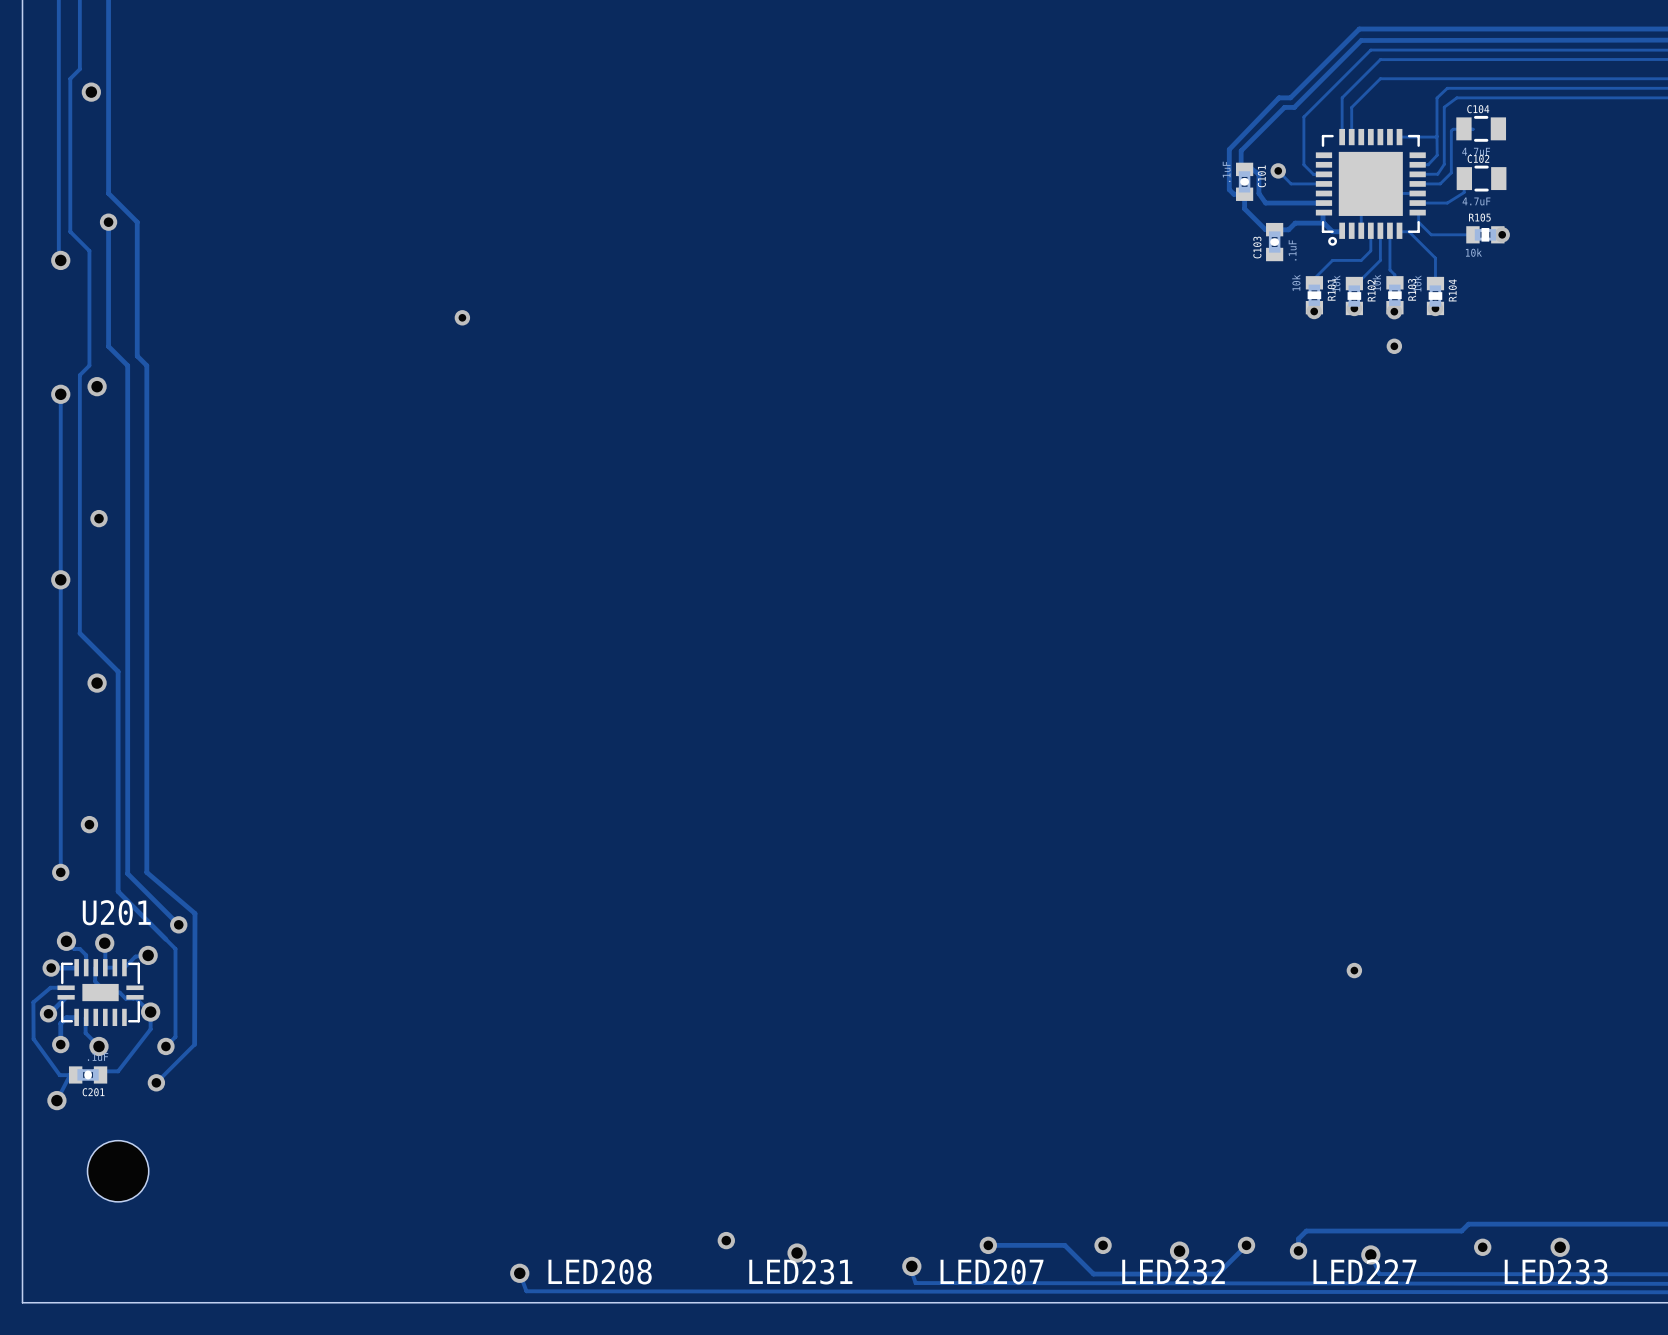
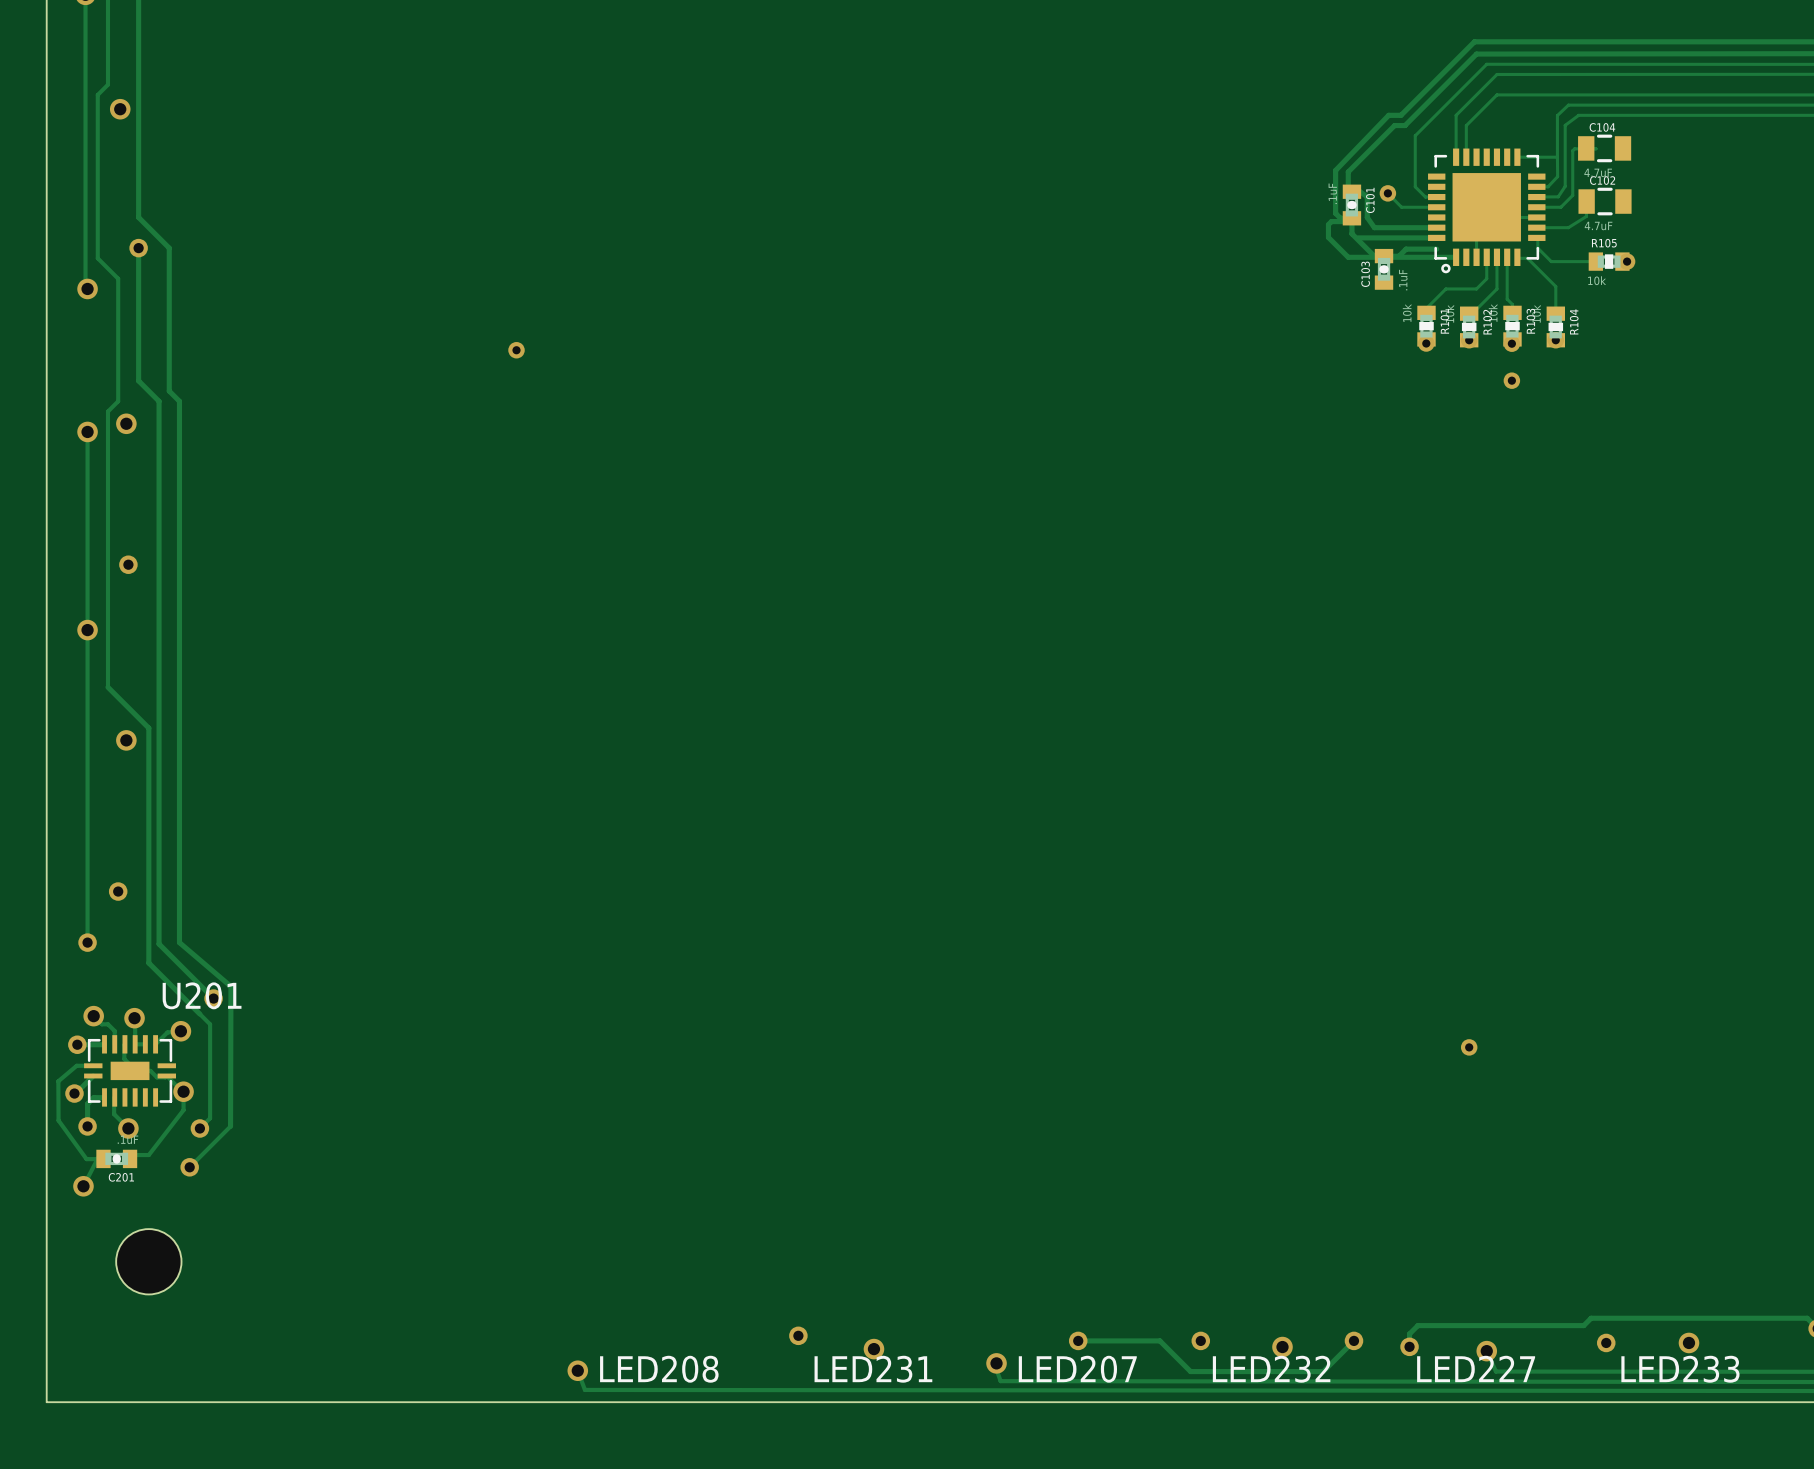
track: none -> (1436, 237) (1358, 237)
track: (1323, 213) (1323, 222) (1332, 231) (1342, 230) -> (1351, 218) (1351, 221) (1331, 221) (1328, 224) (1328, 237) (1348, 257) (1456, 257)
U201 name position: U201 (116, 912) -> U201 (202, 995)

